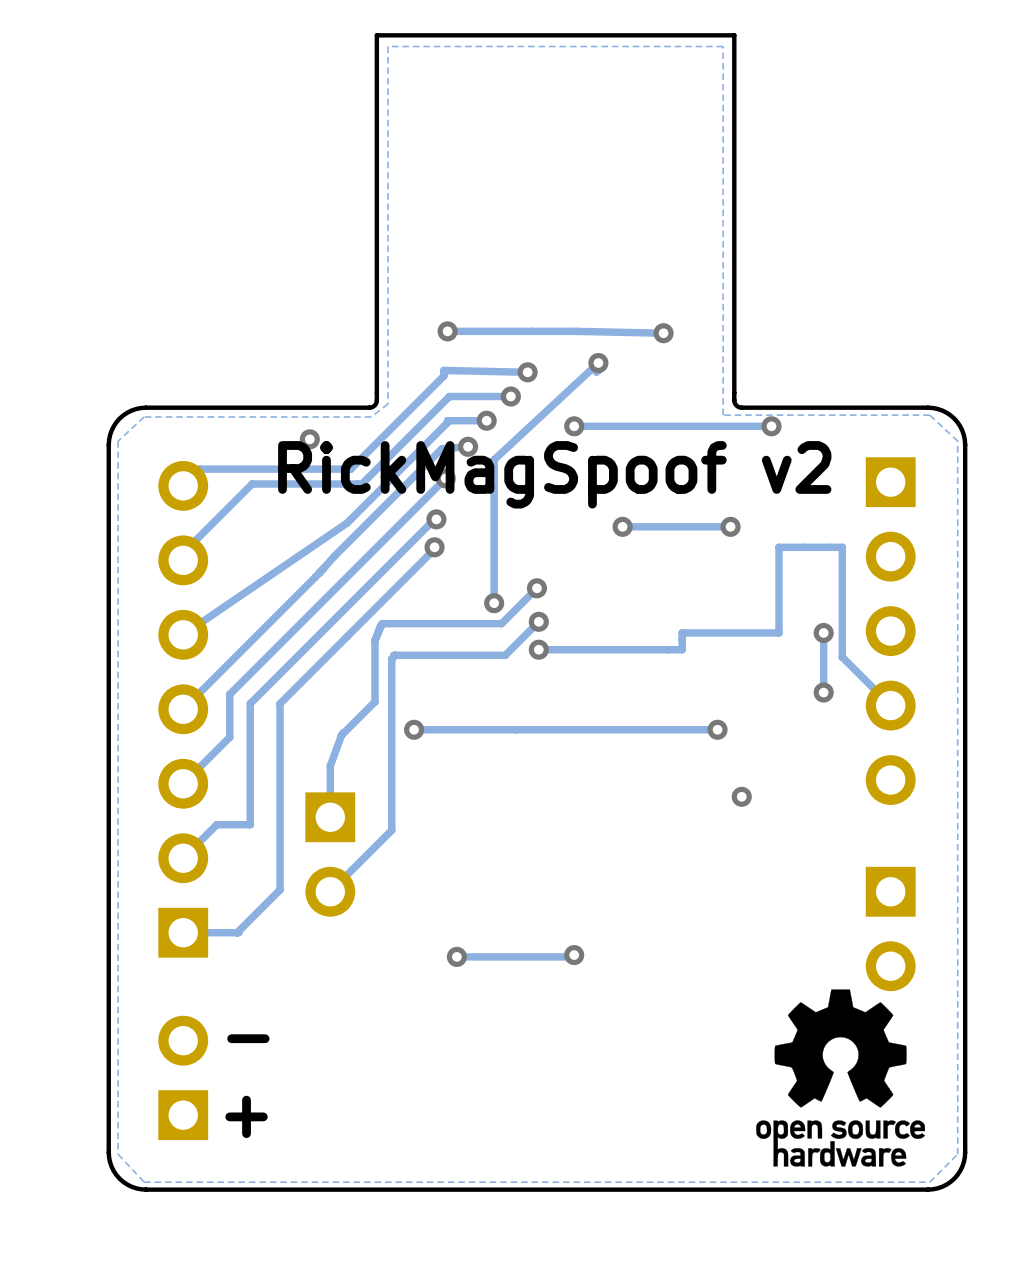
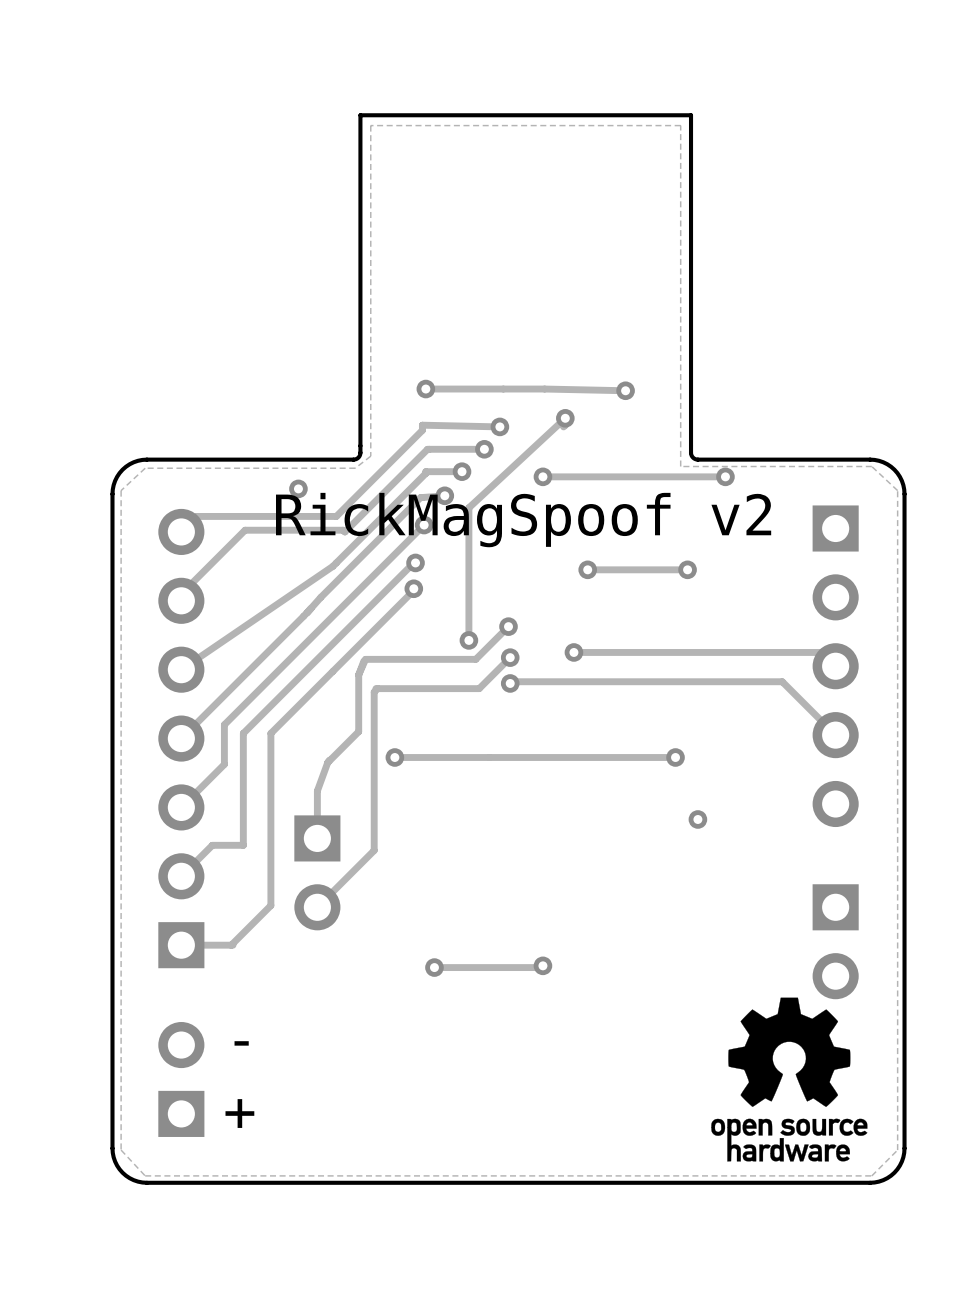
track: none -> (573, 652) (821, 652) (835, 666)
via: none -> (573, 652)
track: (823, 632) (823, 692) -> none
via: (823, 632) -> none
track: (538, 649) (682, 649) (682, 632) (778, 632) (778, 547) (842, 547) (842, 657) -> (510, 681) (782, 681) (790, 690)
via: (823, 692) -> none

